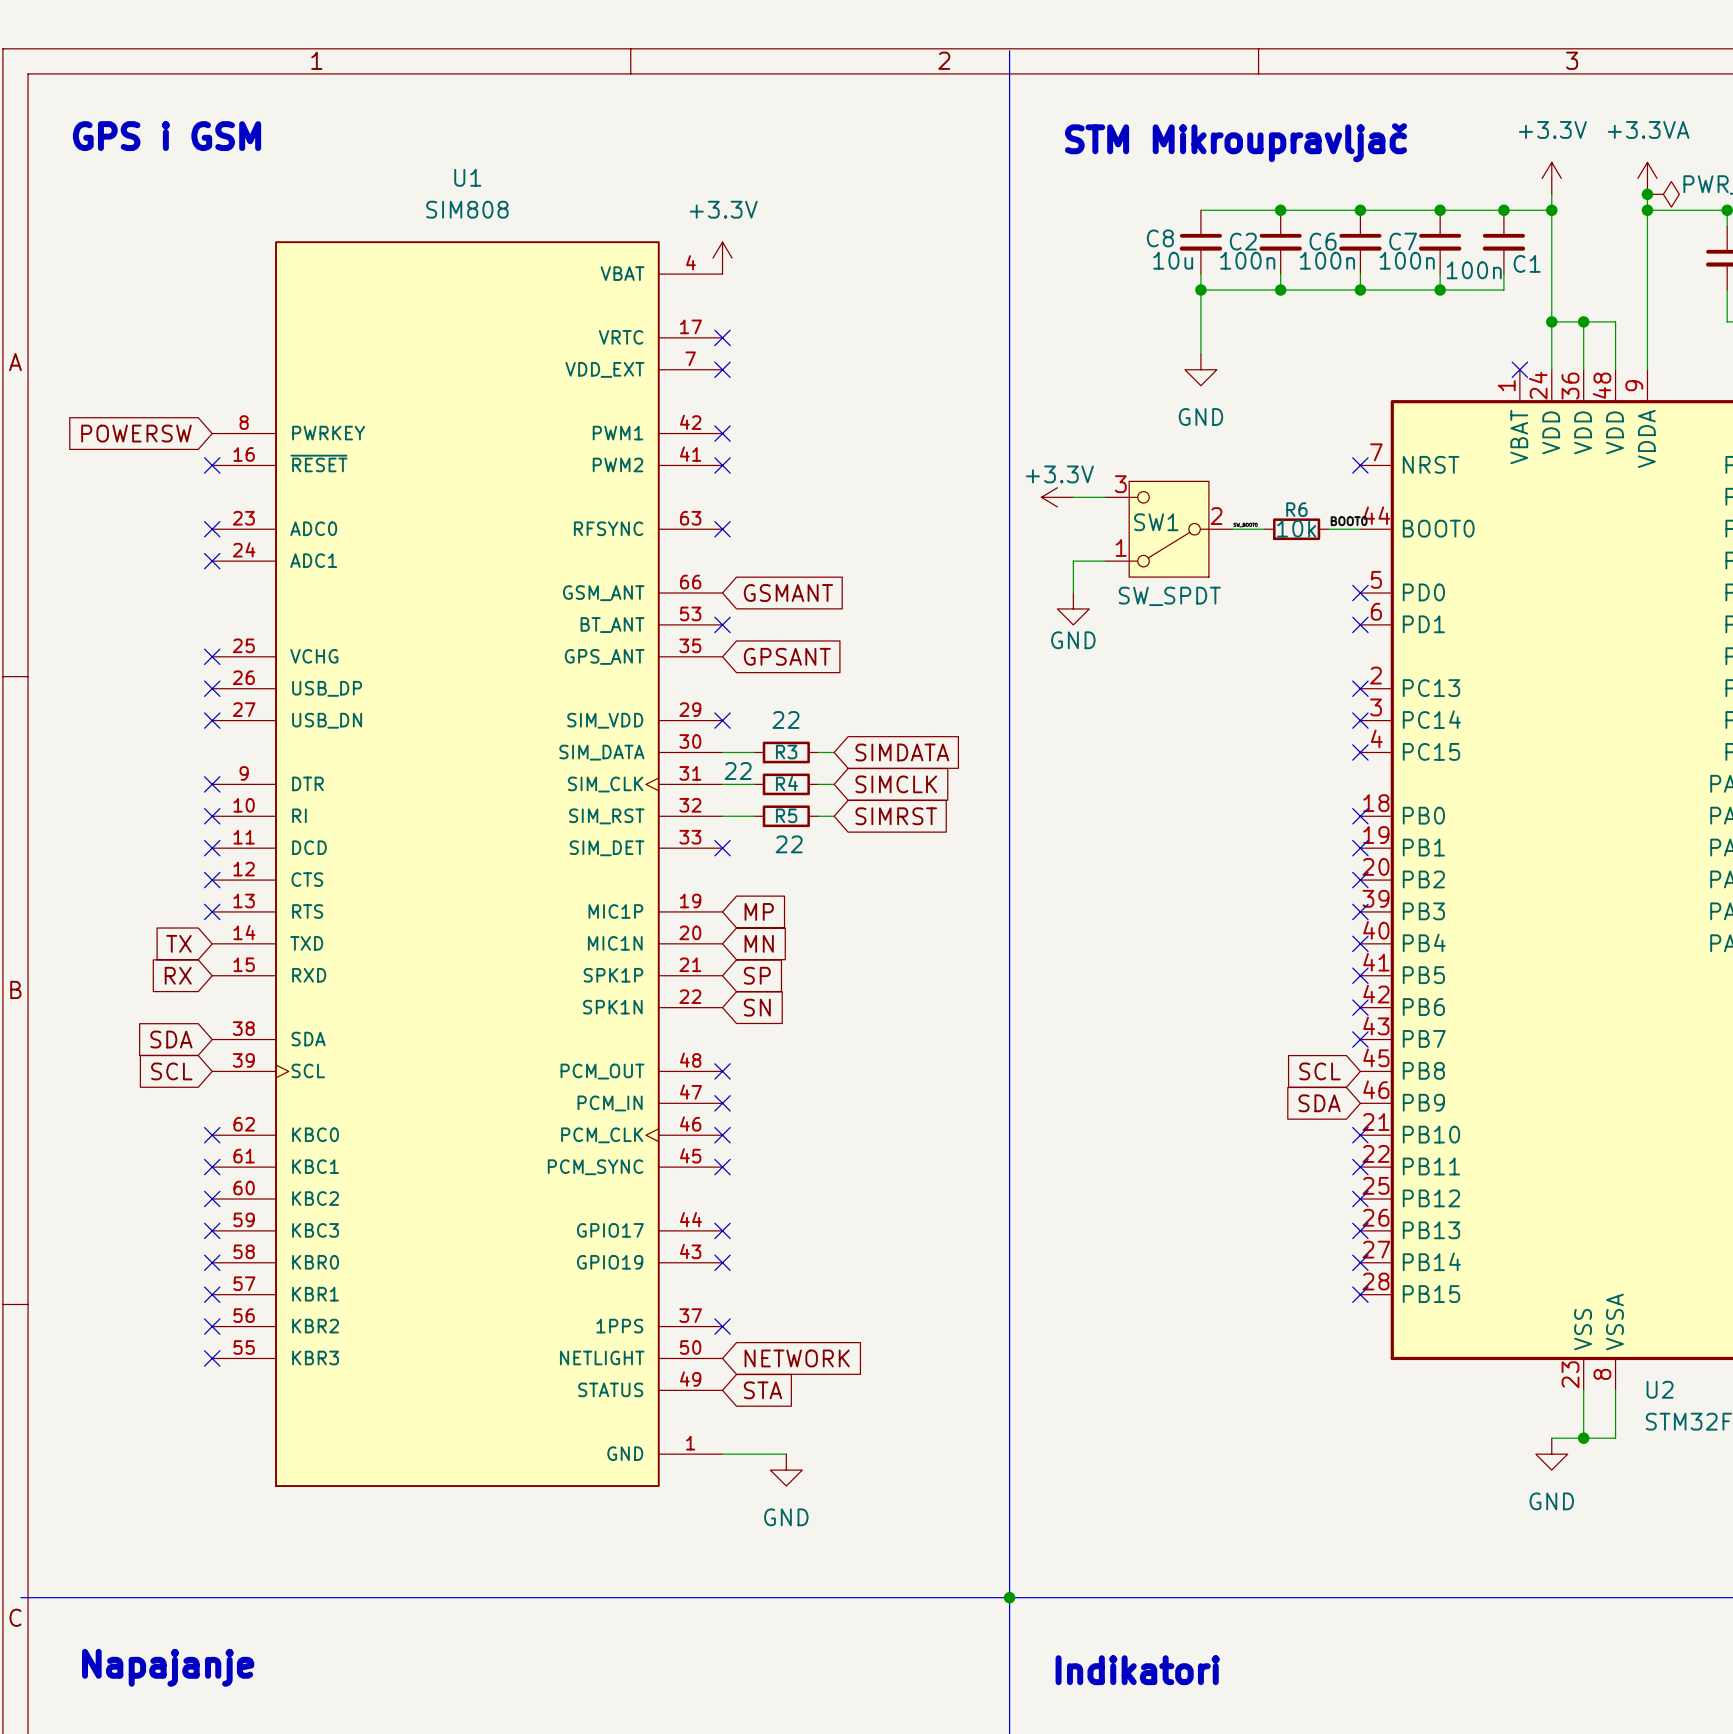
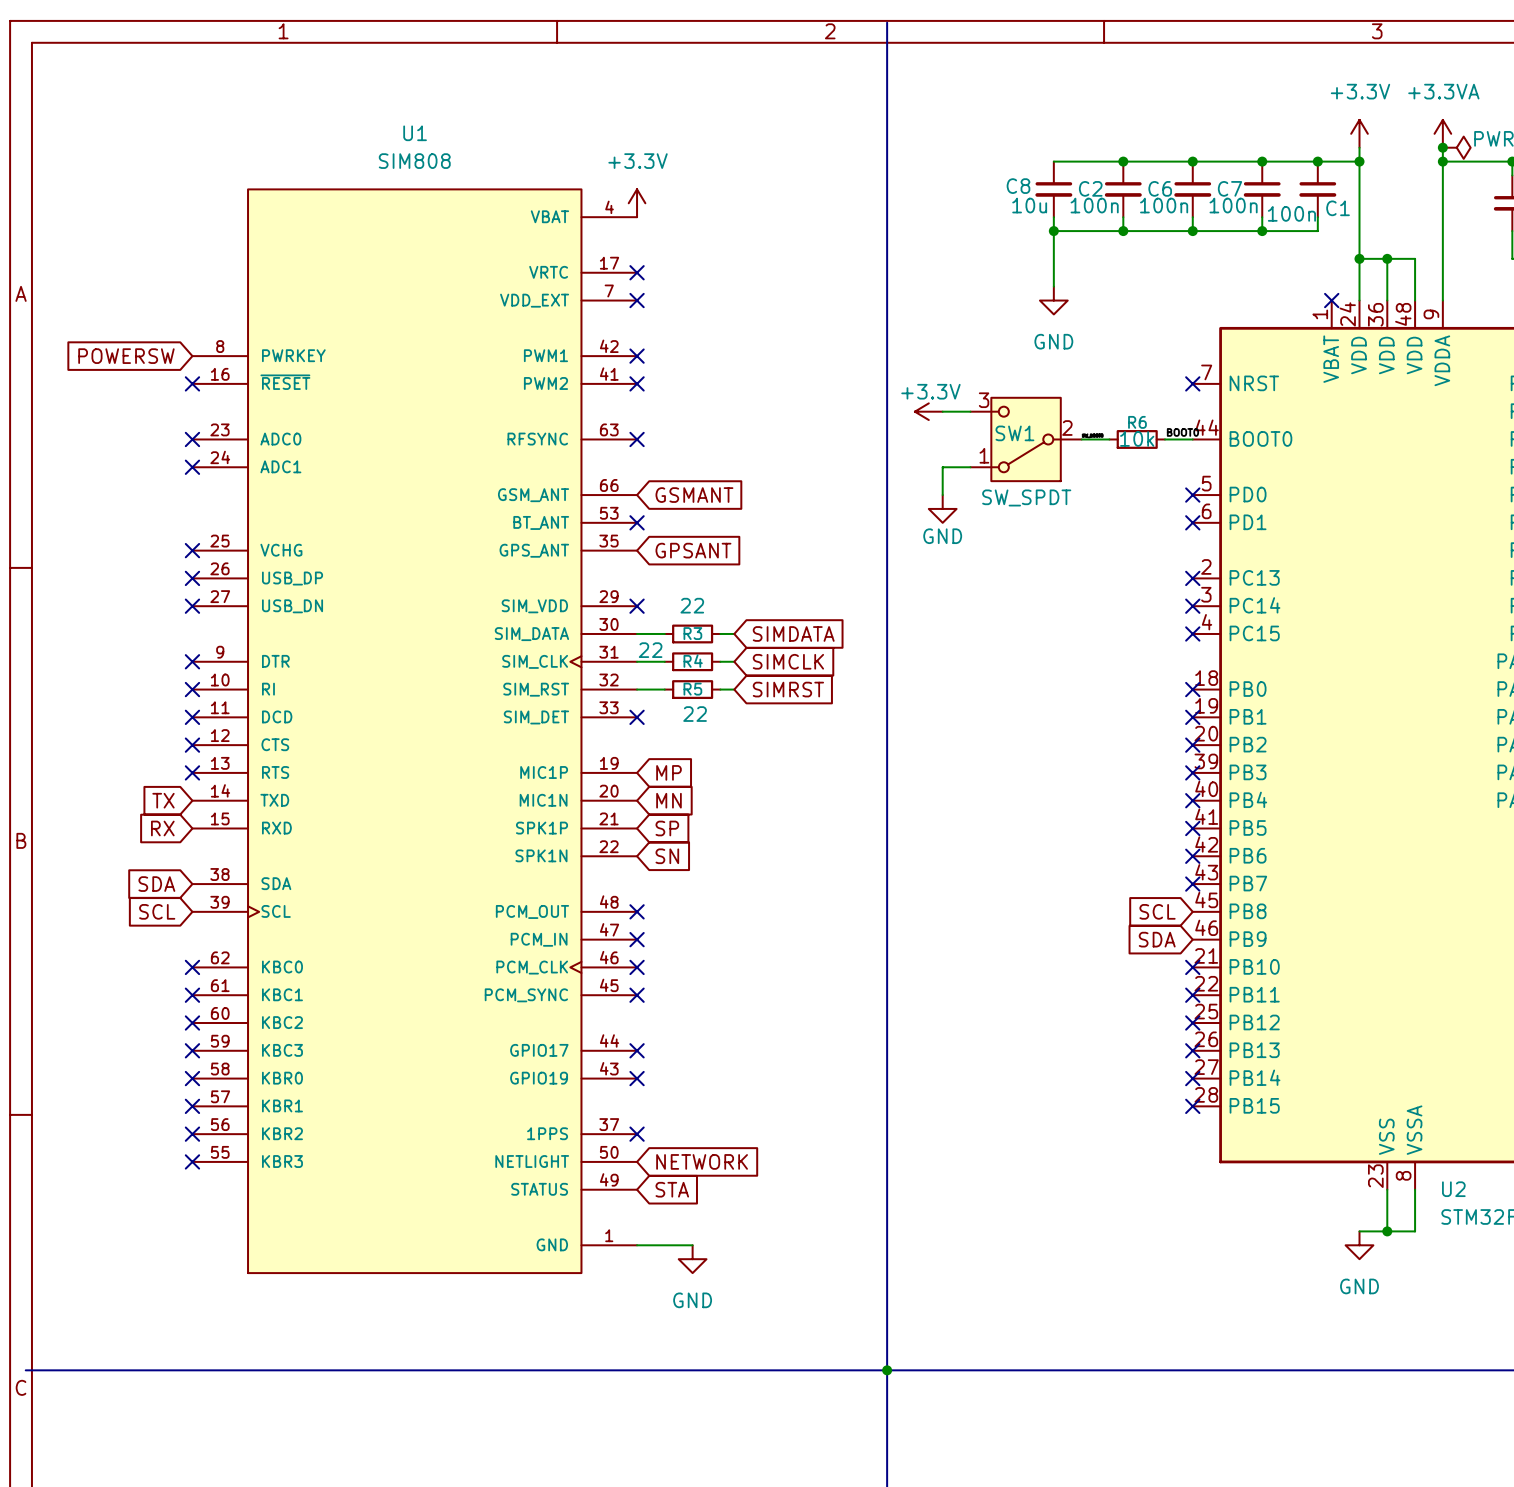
text: GPS i GSM (167, 136) -> none
text: STM Mikroupravljač (1236, 142) -> none
text: Napajanje (168, 1667) -> none
text: Indikatori (1137, 1670) -> none

